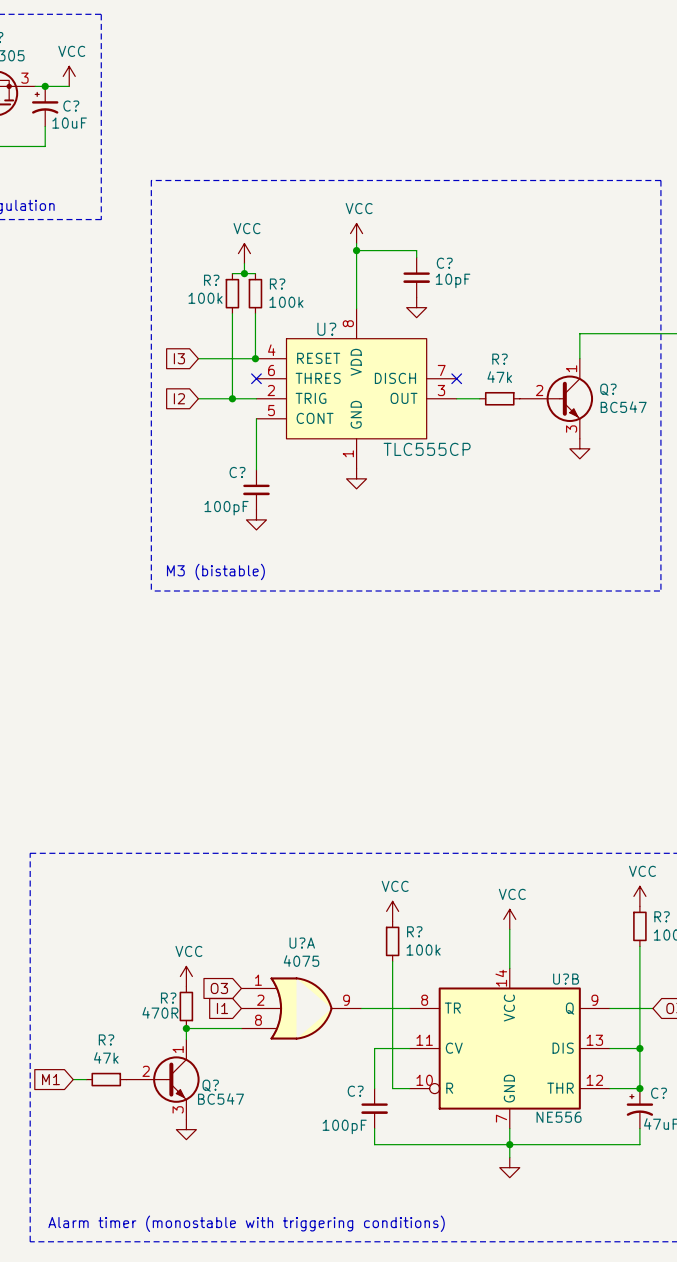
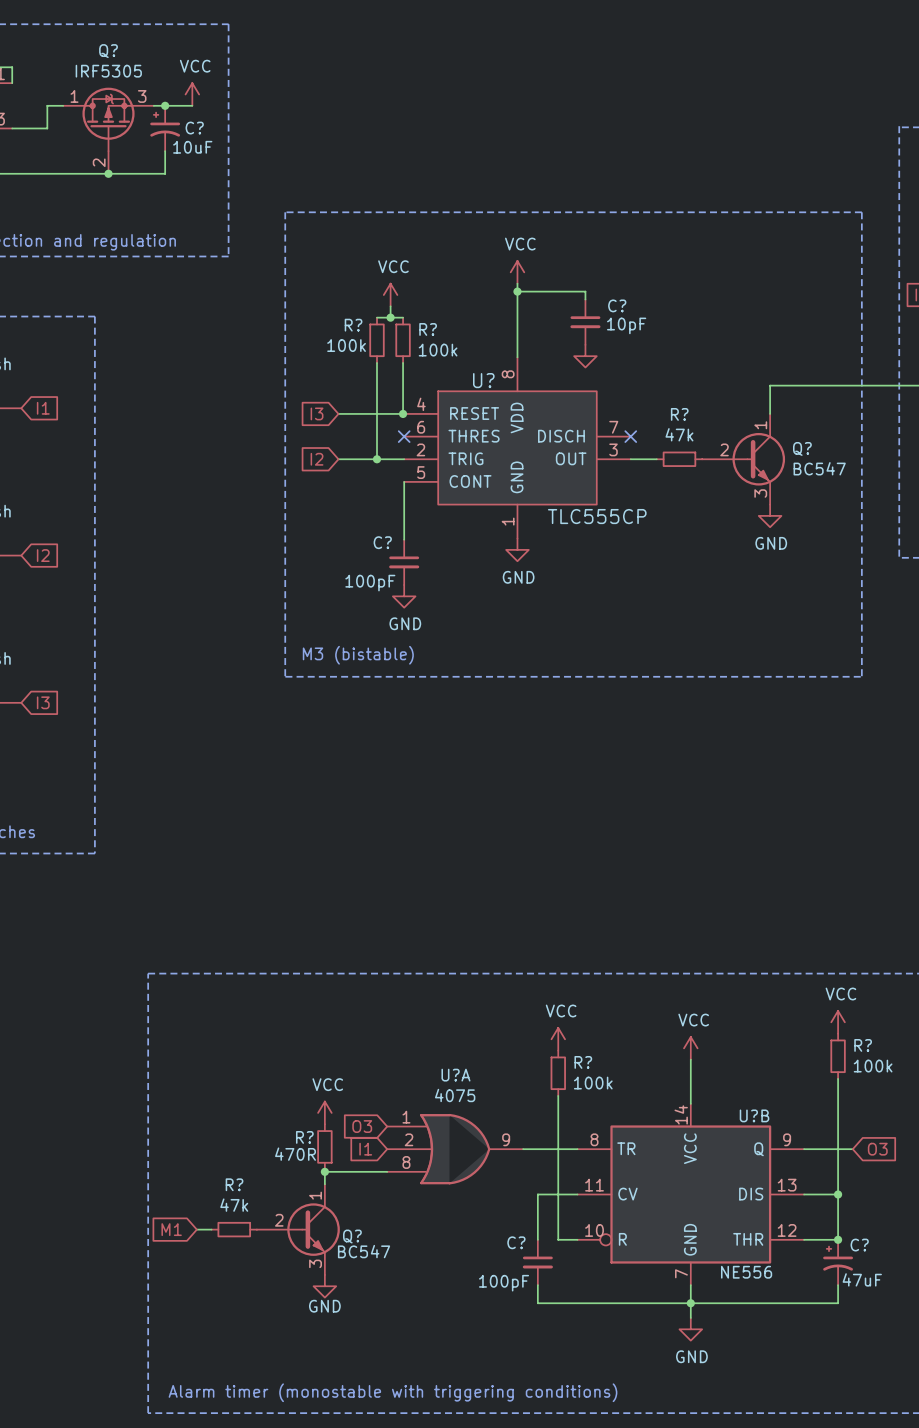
power symbol text: none -> GND (771, 543)
power symbol text: none -> GND (518, 577)
power symbol text: none -> GND (405, 623)
power symbol text: none -> GND (324, 1306)
power symbol text: none -> GND (691, 1356)

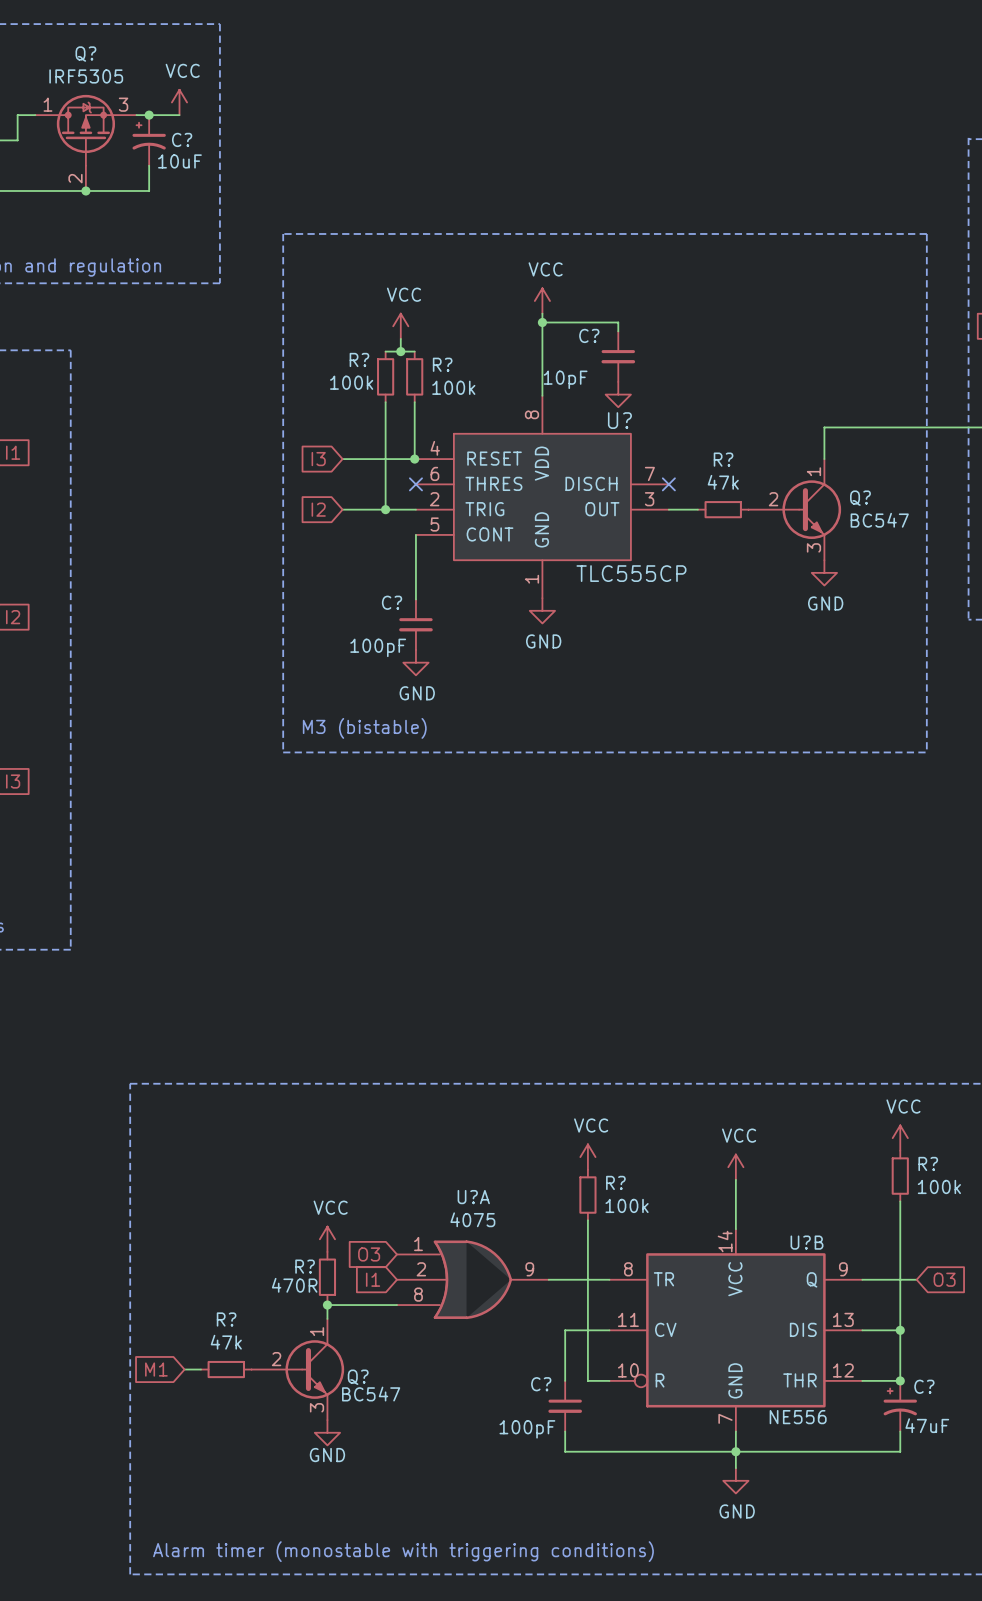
C? name position: C? (617, 305) -> C? (589, 335)
C? value position: 10pF (626, 325) -> 10pF (565, 379)
U? name position: U? (483, 380) -> U? (619, 420)

